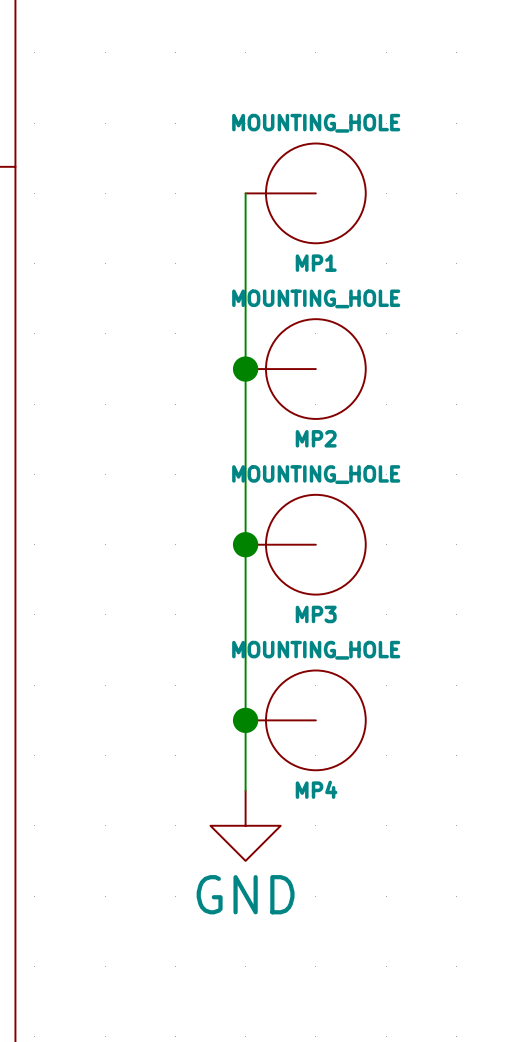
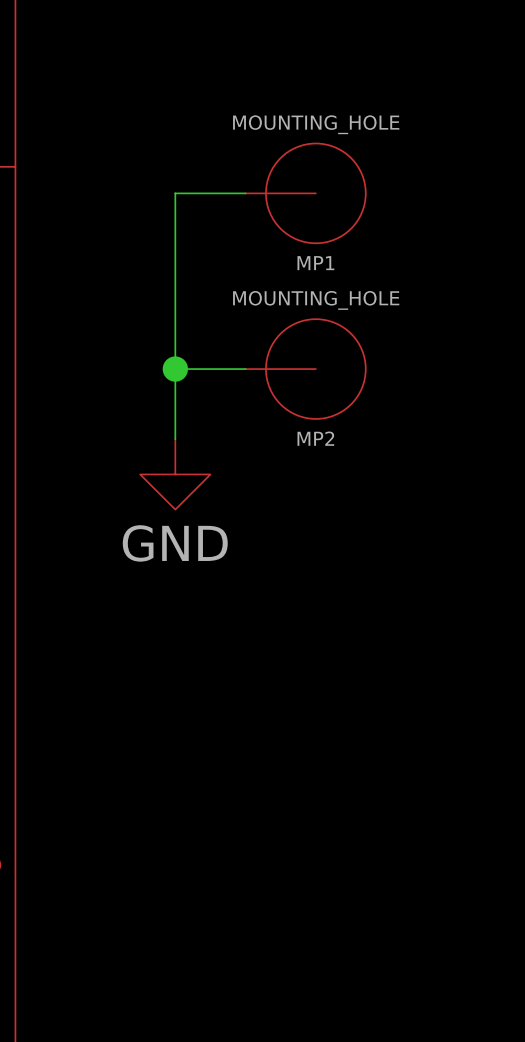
wire: (245, 193) (245, 790) -> (245, 193) (175, 193) (175, 439)
wire: none -> (175, 369) (245, 369)
junction position: (245, 369) -> (175, 369)
junction: (245, 544) -> none
MP3: MOUNTING_HOLE (305, 544) -> none
junction: (245, 720) -> none
MP4: MOUNTING_HOLE (305, 720) -> none
power symbol position: GND (245, 825) -> GND (175, 474)

